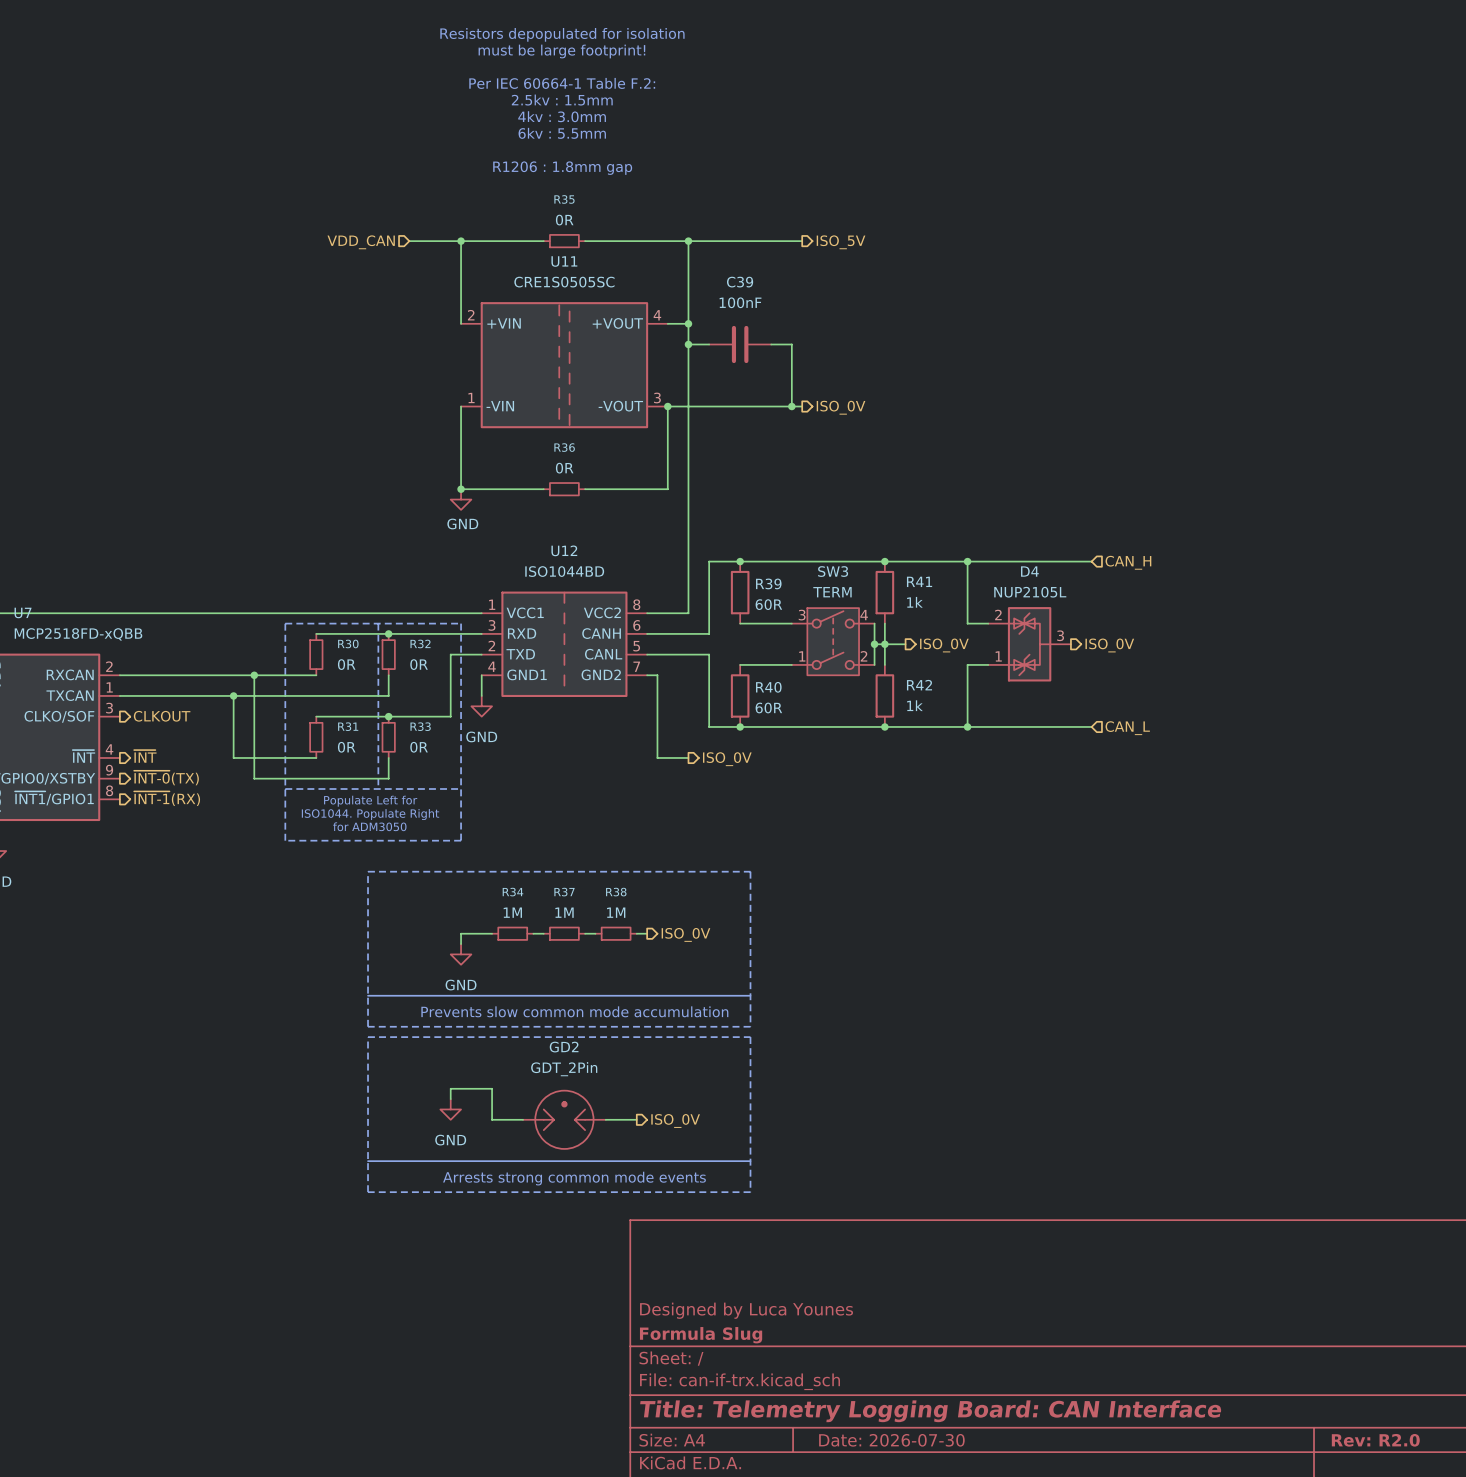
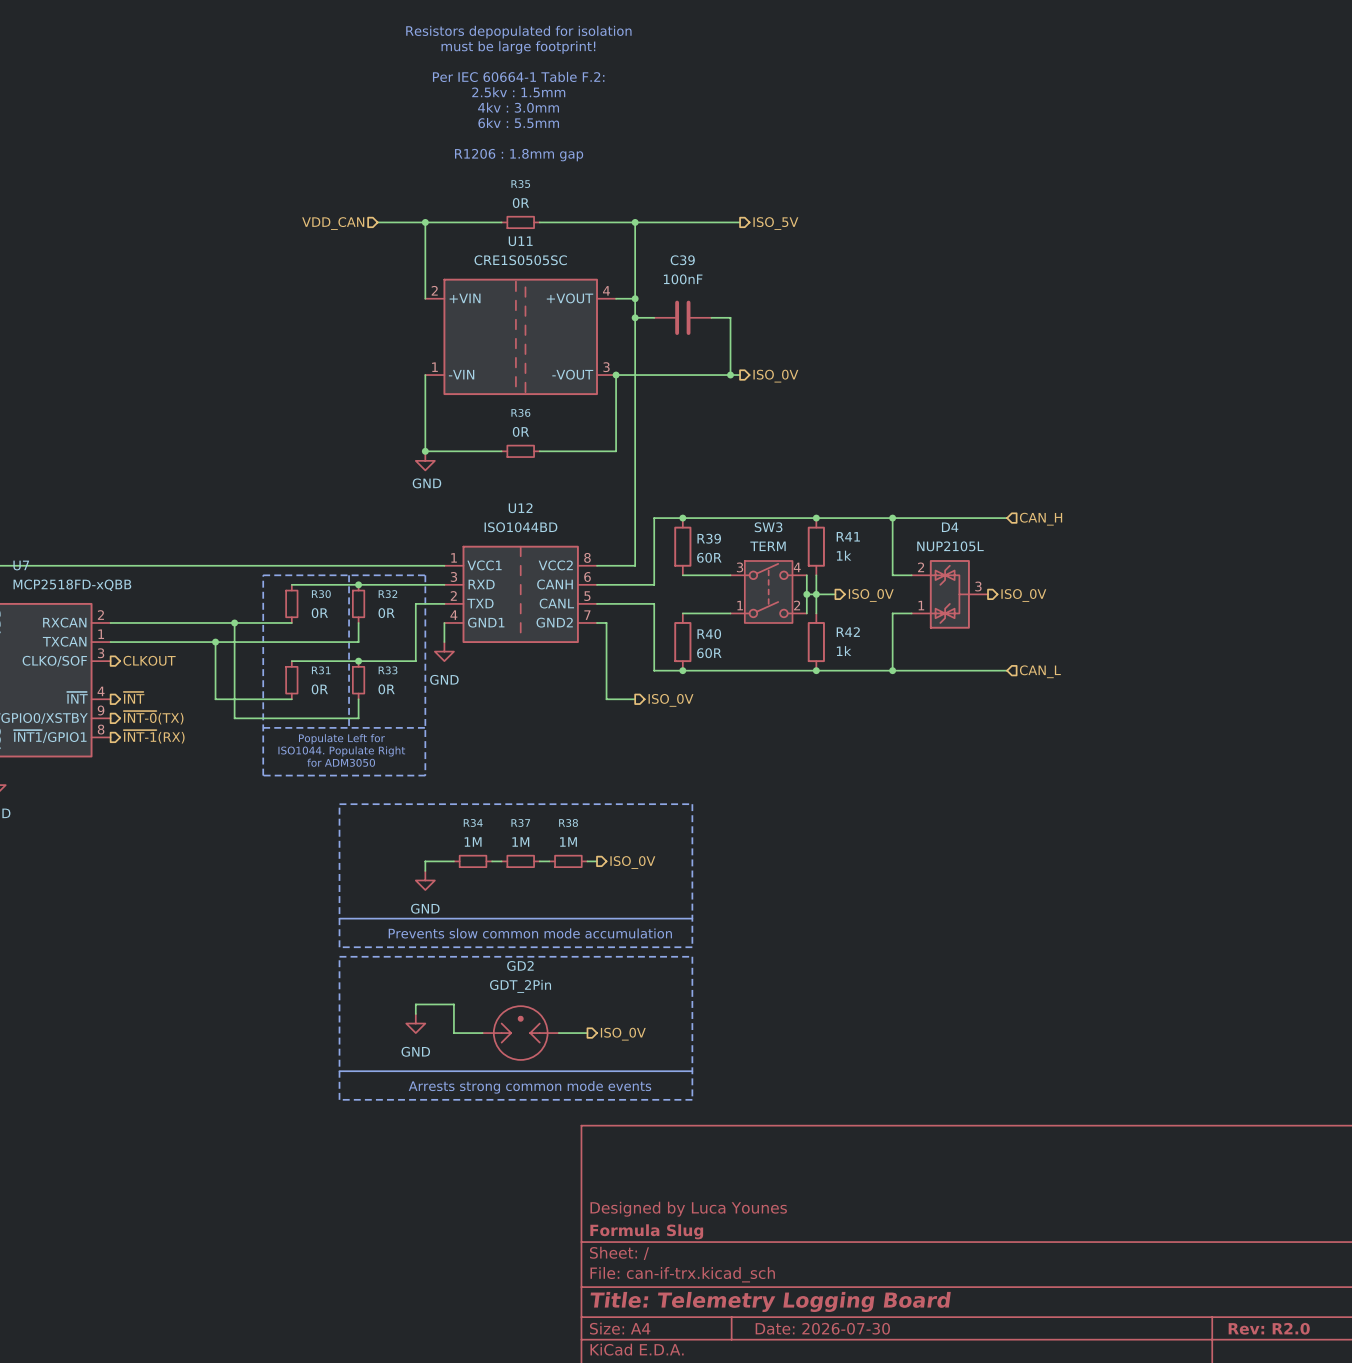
title block: Title: Telemetry Logging Board: CAN Interface (930, 1411) -> Title: Telemetry Logging Board (770, 1301)

